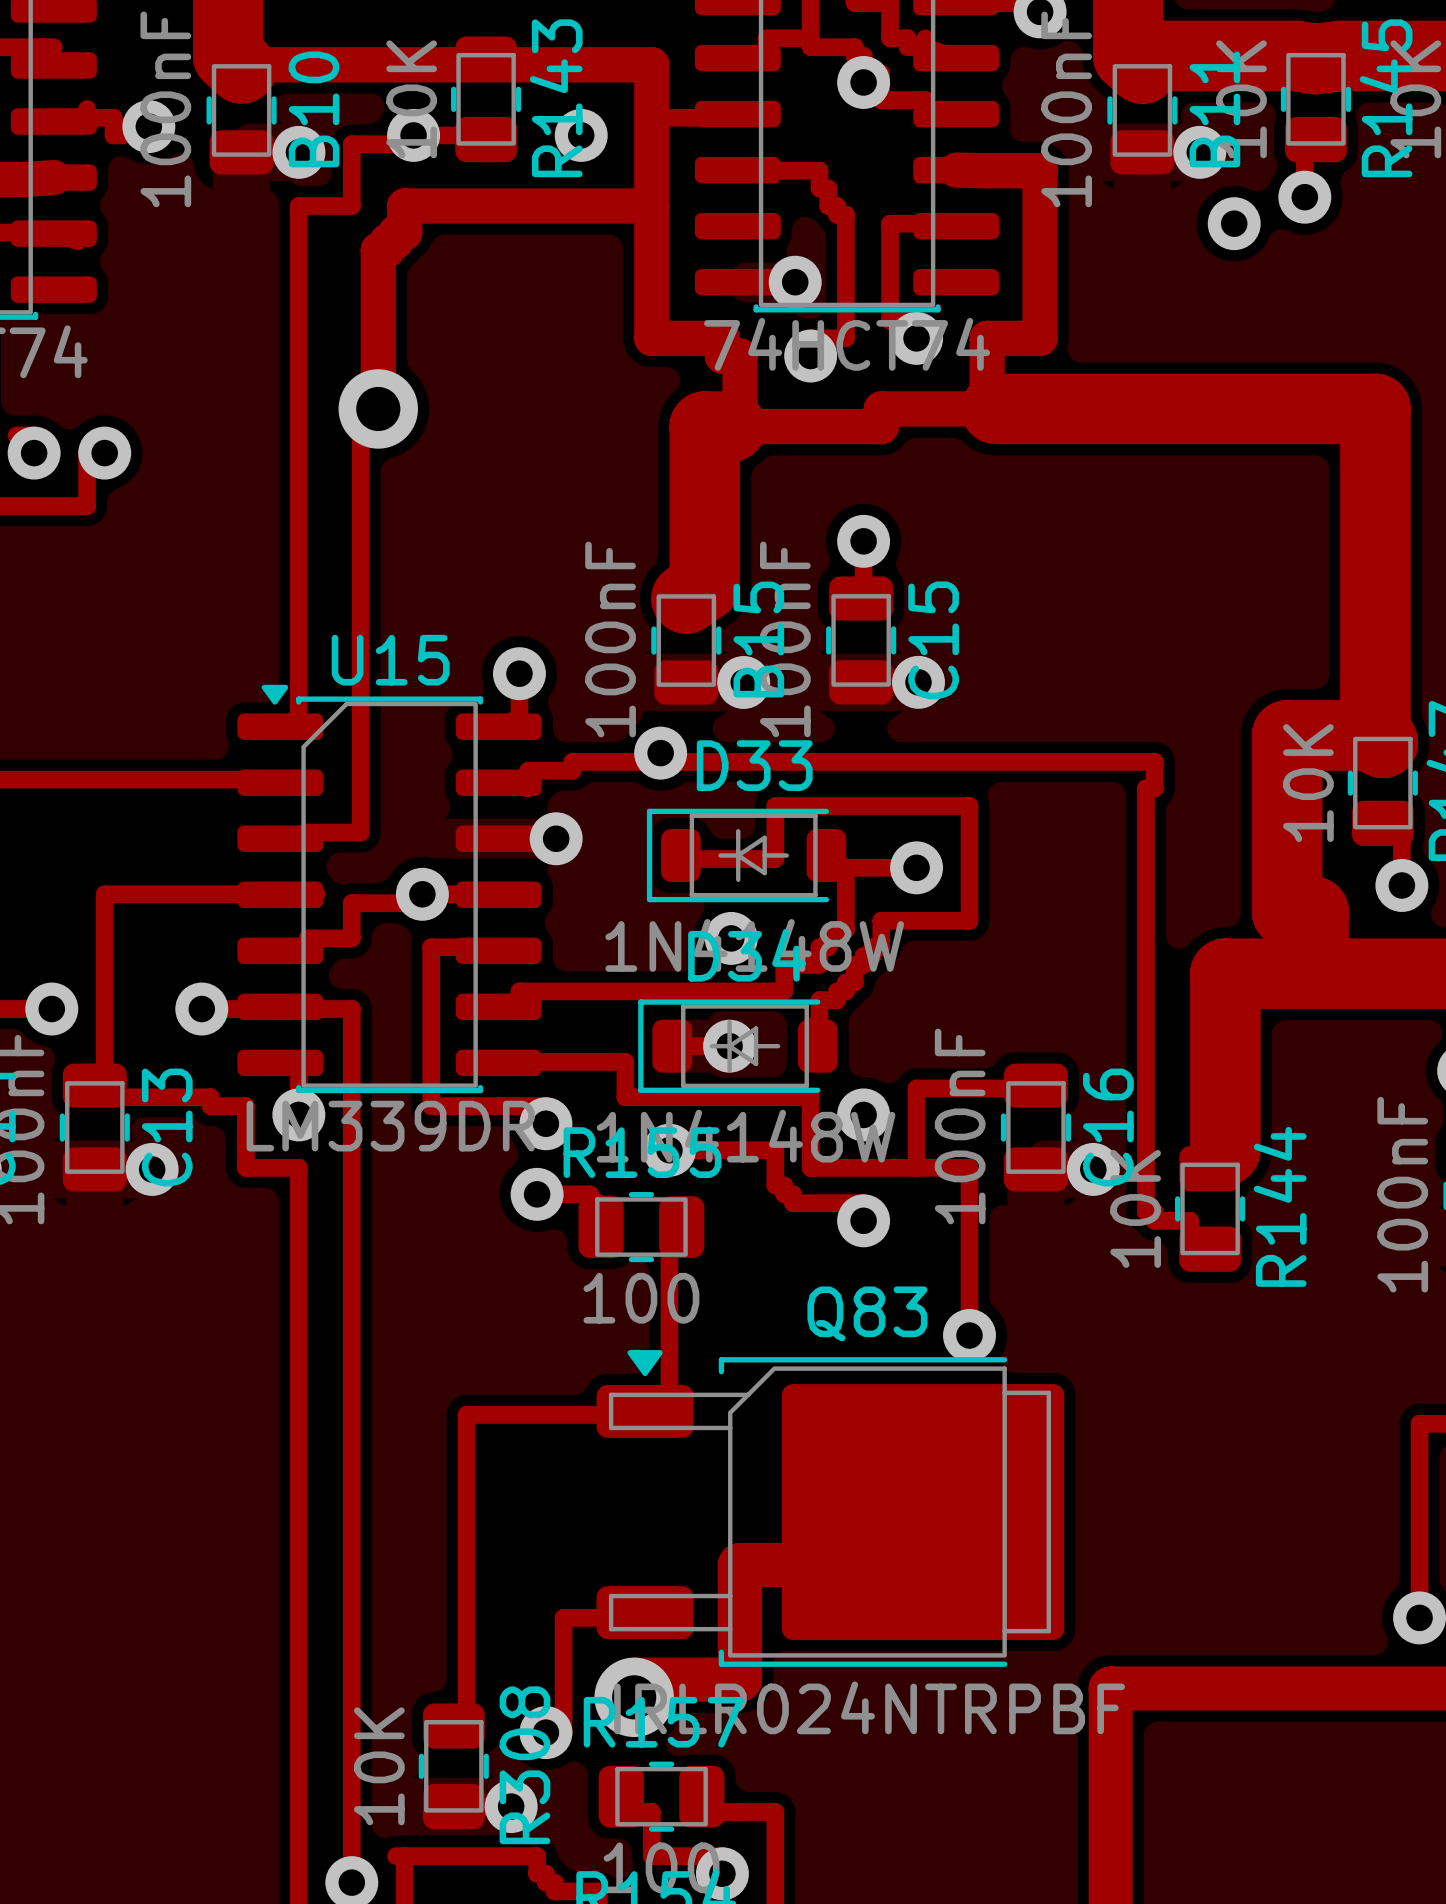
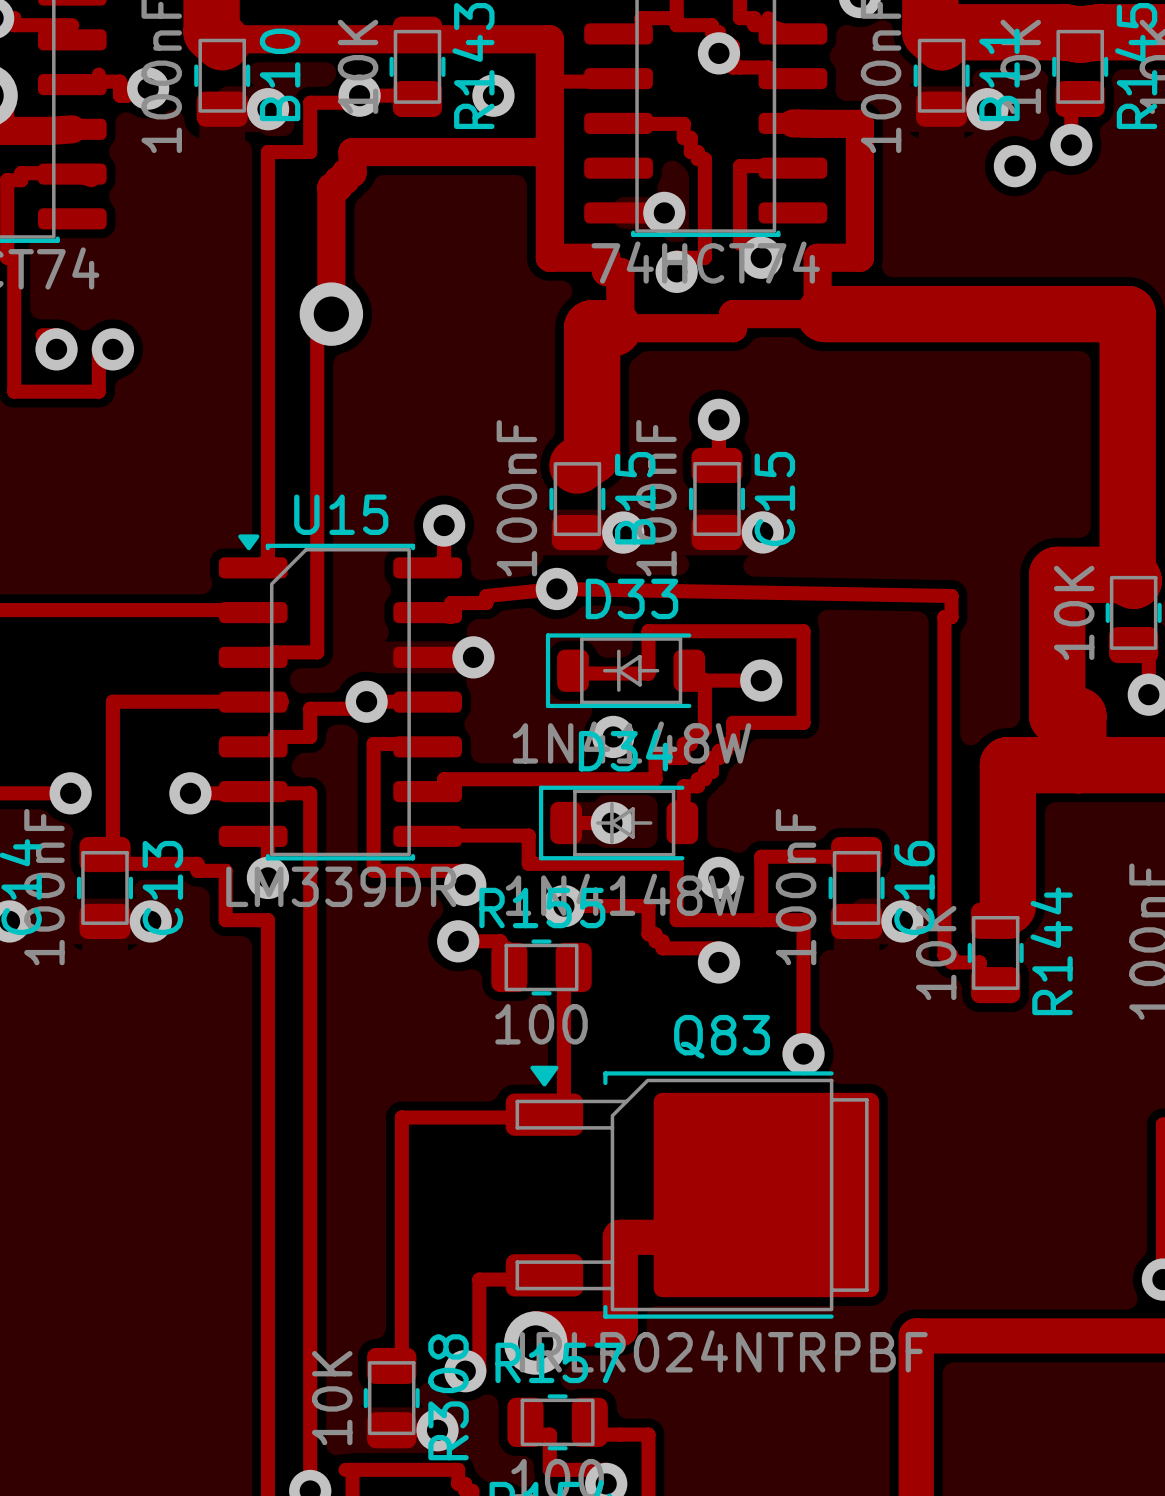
track: (572, 761) (643, 761) -> none
track: (678, 761) (1154, 761) -> (486, 596) (556, 588) (951, 596)

